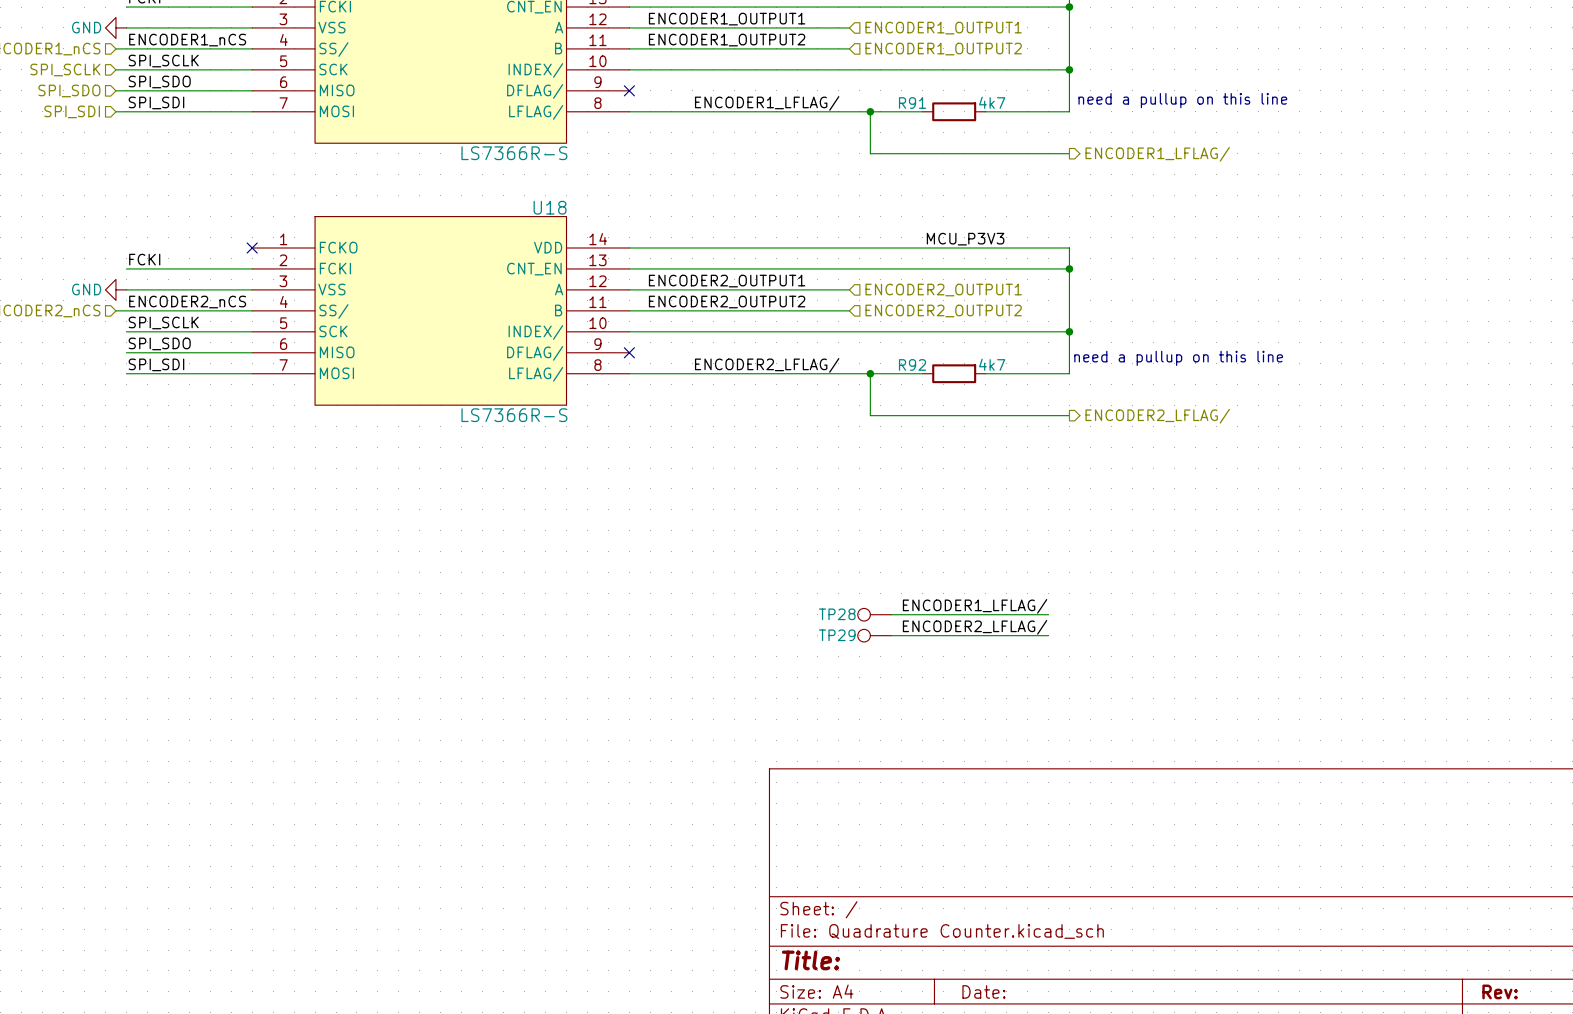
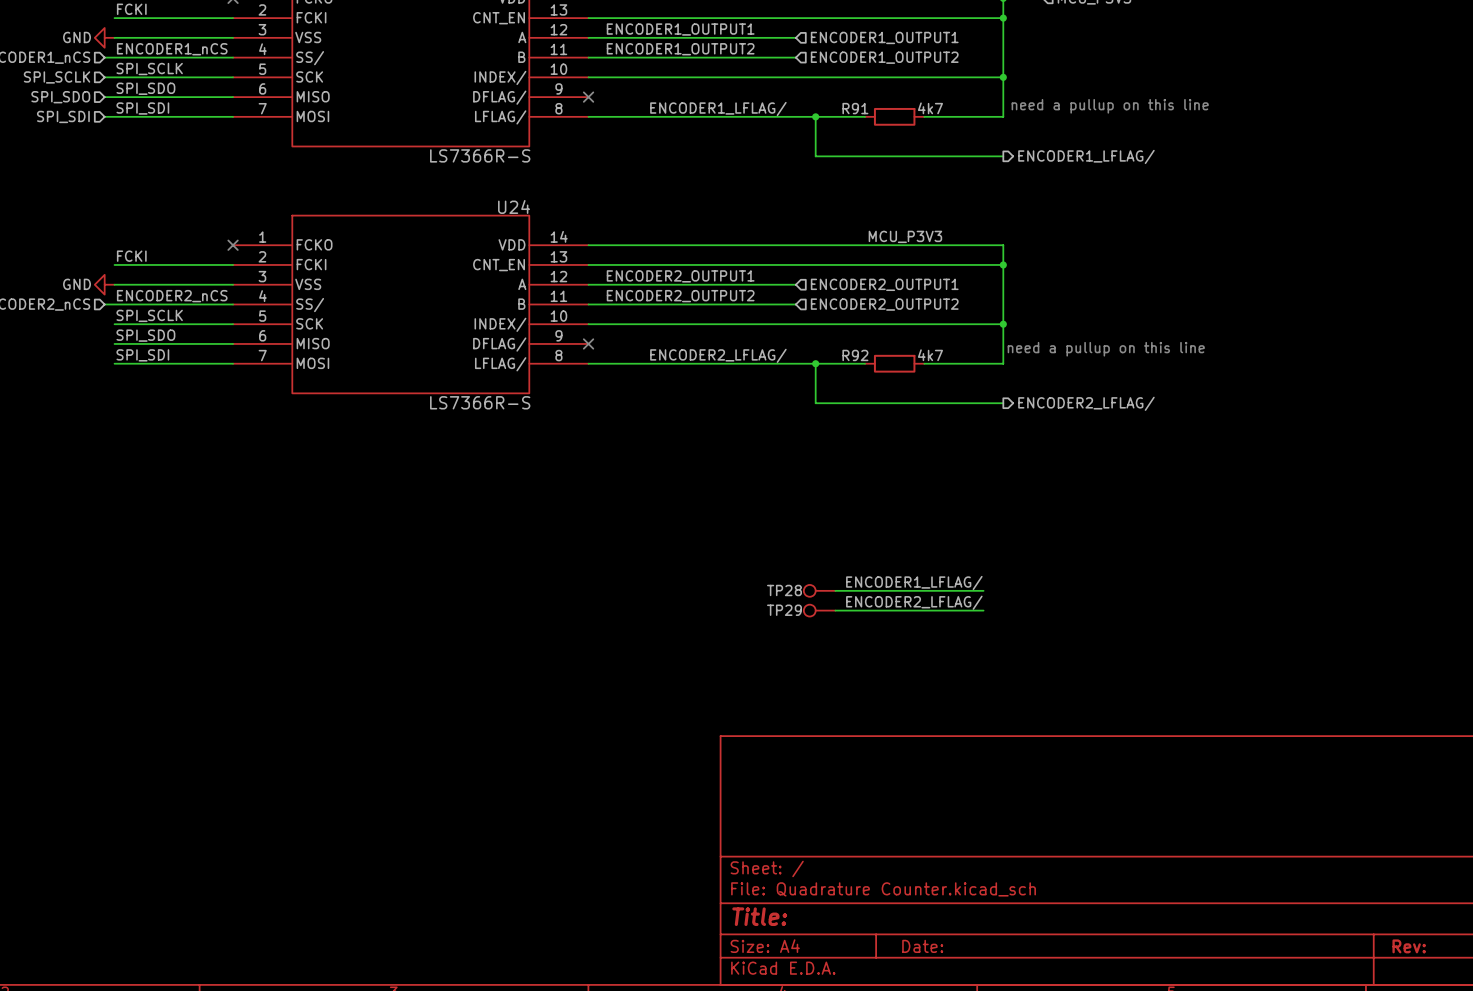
U18 name: U18 (550, 207) -> U24 (514, 206)

